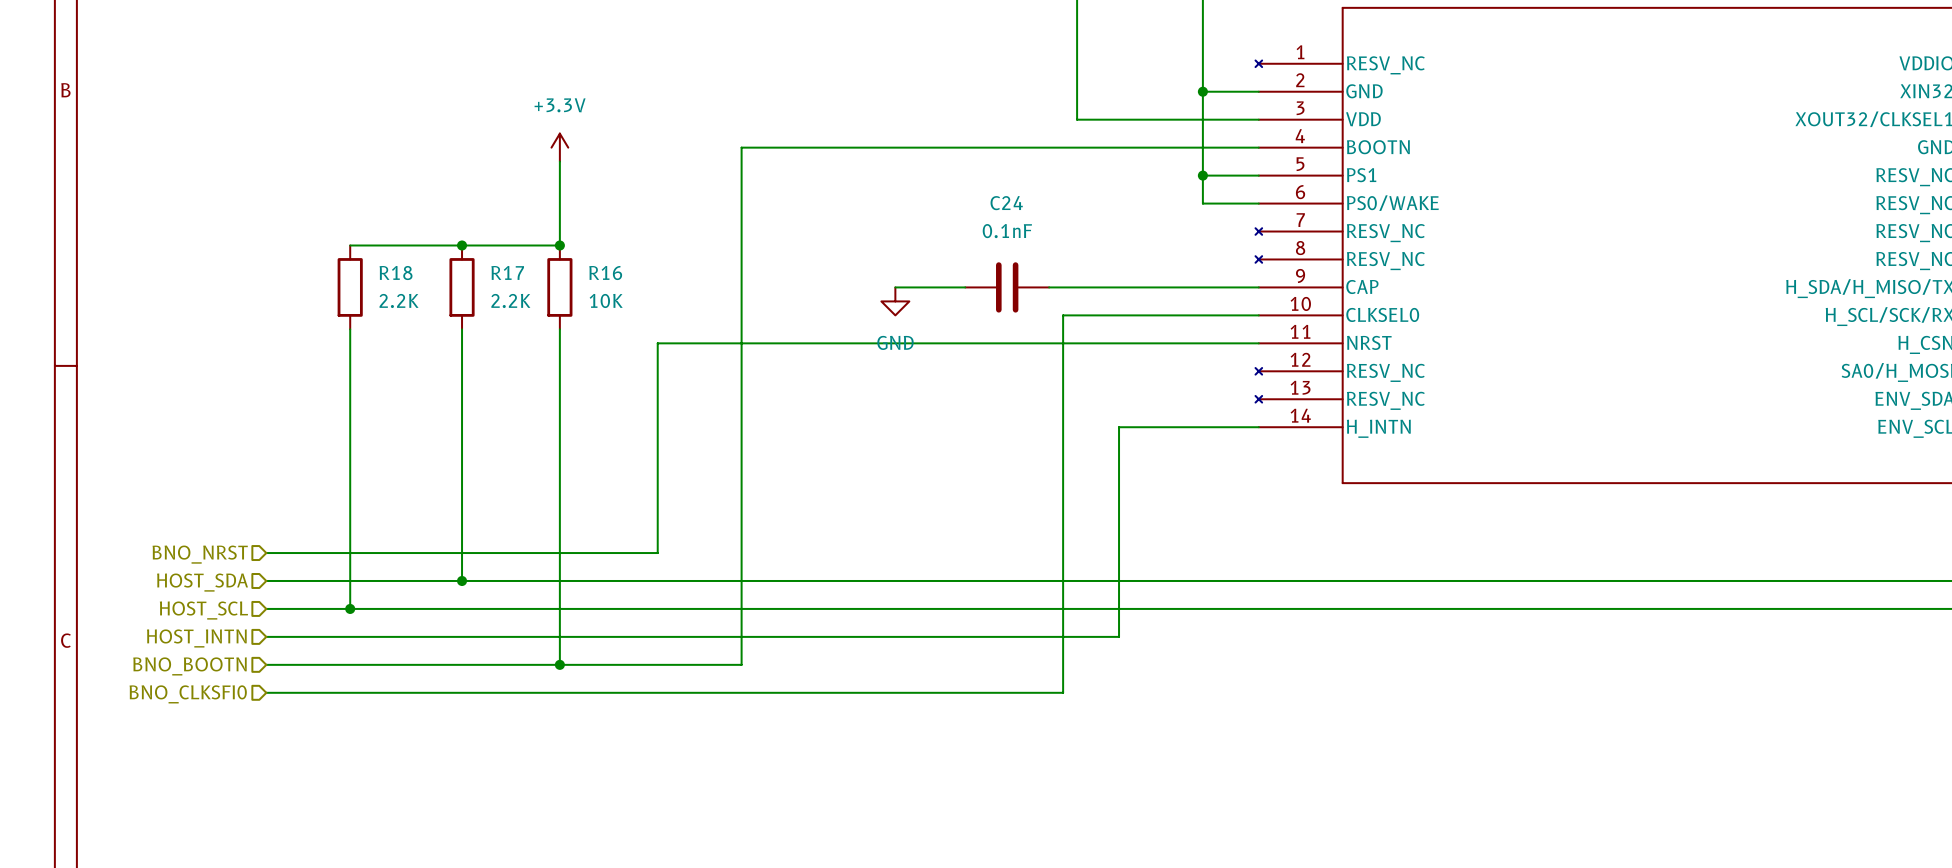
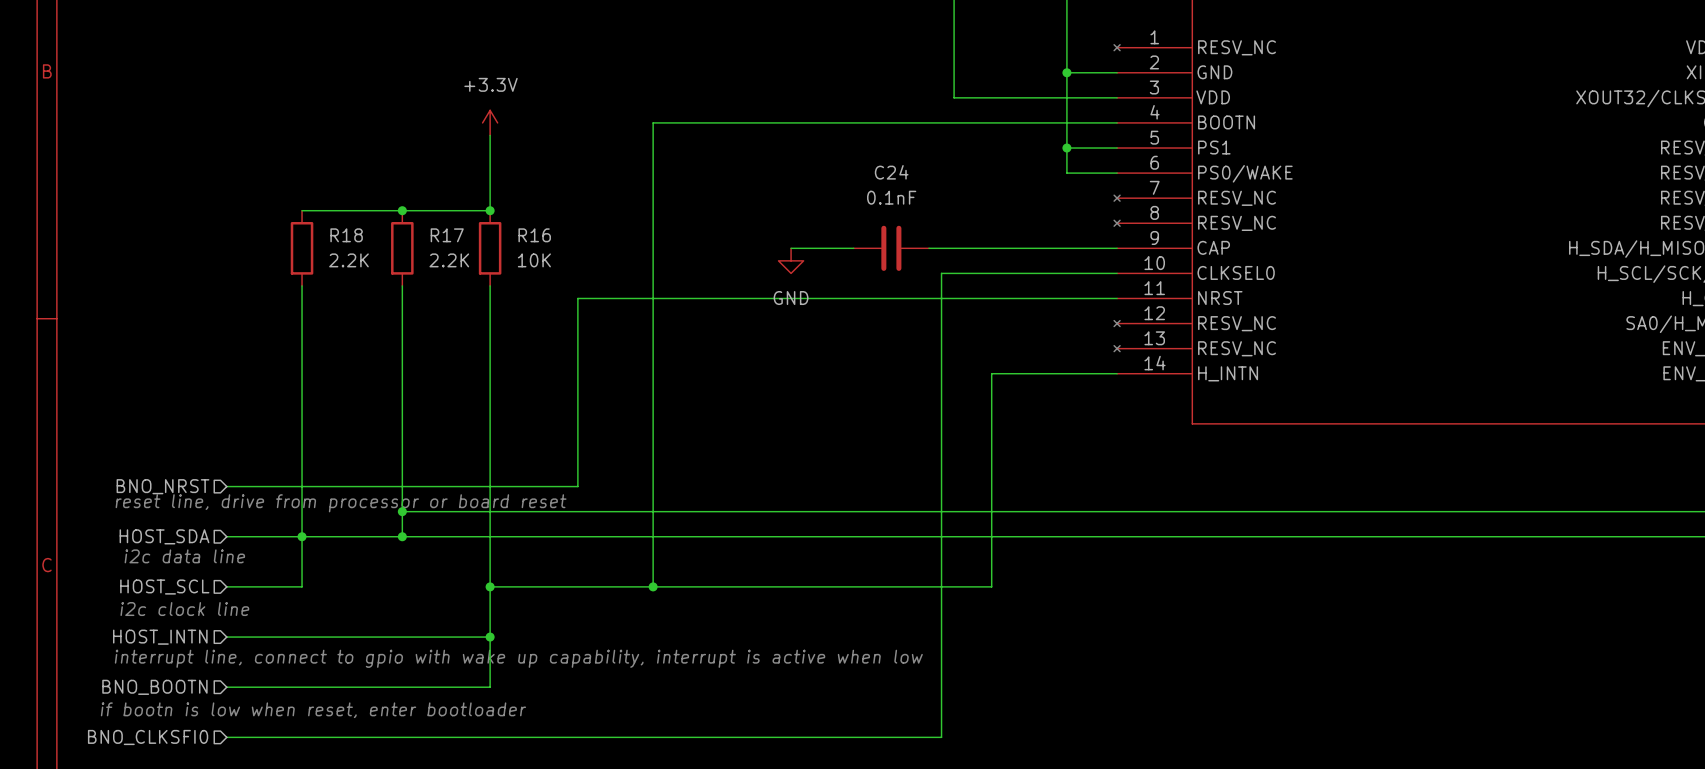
text: none -> reset line, drive from processor or board reset (341, 503)
wire: (266, 580) (462, 580) -> (402, 536) (402, 511)
hierarchical label: HOST_SDA (202, 582) -> none
wire: none -> (302, 536) (302, 586)
junction: none -> (402, 536)
hierarchical label: HOST_SCL (203, 610) -> HOST_SDA (164, 536)
text: none -> i2c data line (184, 556)
wire: (266, 636) (1119, 636) -> (653, 586) (991, 586) (991, 561)
hierarchical label position: HOST_INTN (196, 638) -> HOST_INTN (160, 637)
wire: (350, 664) (559, 664) -> (226, 687) (490, 687) (490, 586)
junction: none -> (653, 586)
hierarchical label: BNO_BOOTN (189, 666) -> HOST_SCL (164, 587)
text: none -> i2c clock line (184, 609)
wire: (266, 692) (1063, 692) -> (226, 737) (941, 737) (941, 611)
hierarchical label position: BNO_CLKSFI0 (188, 694) -> BNO_CLKSFI0 (148, 737)
wire: none -> (226, 637) (490, 637)
junction: none -> (490, 637)
text: none -> interrupt line, connect to gpio with wake up capability, interrupt is active when low (518, 658)
hierarchical label: none -> BNO_BOOTN (154, 687)
text: none -> if bootn is low when reset, enter bootloader (313, 710)

